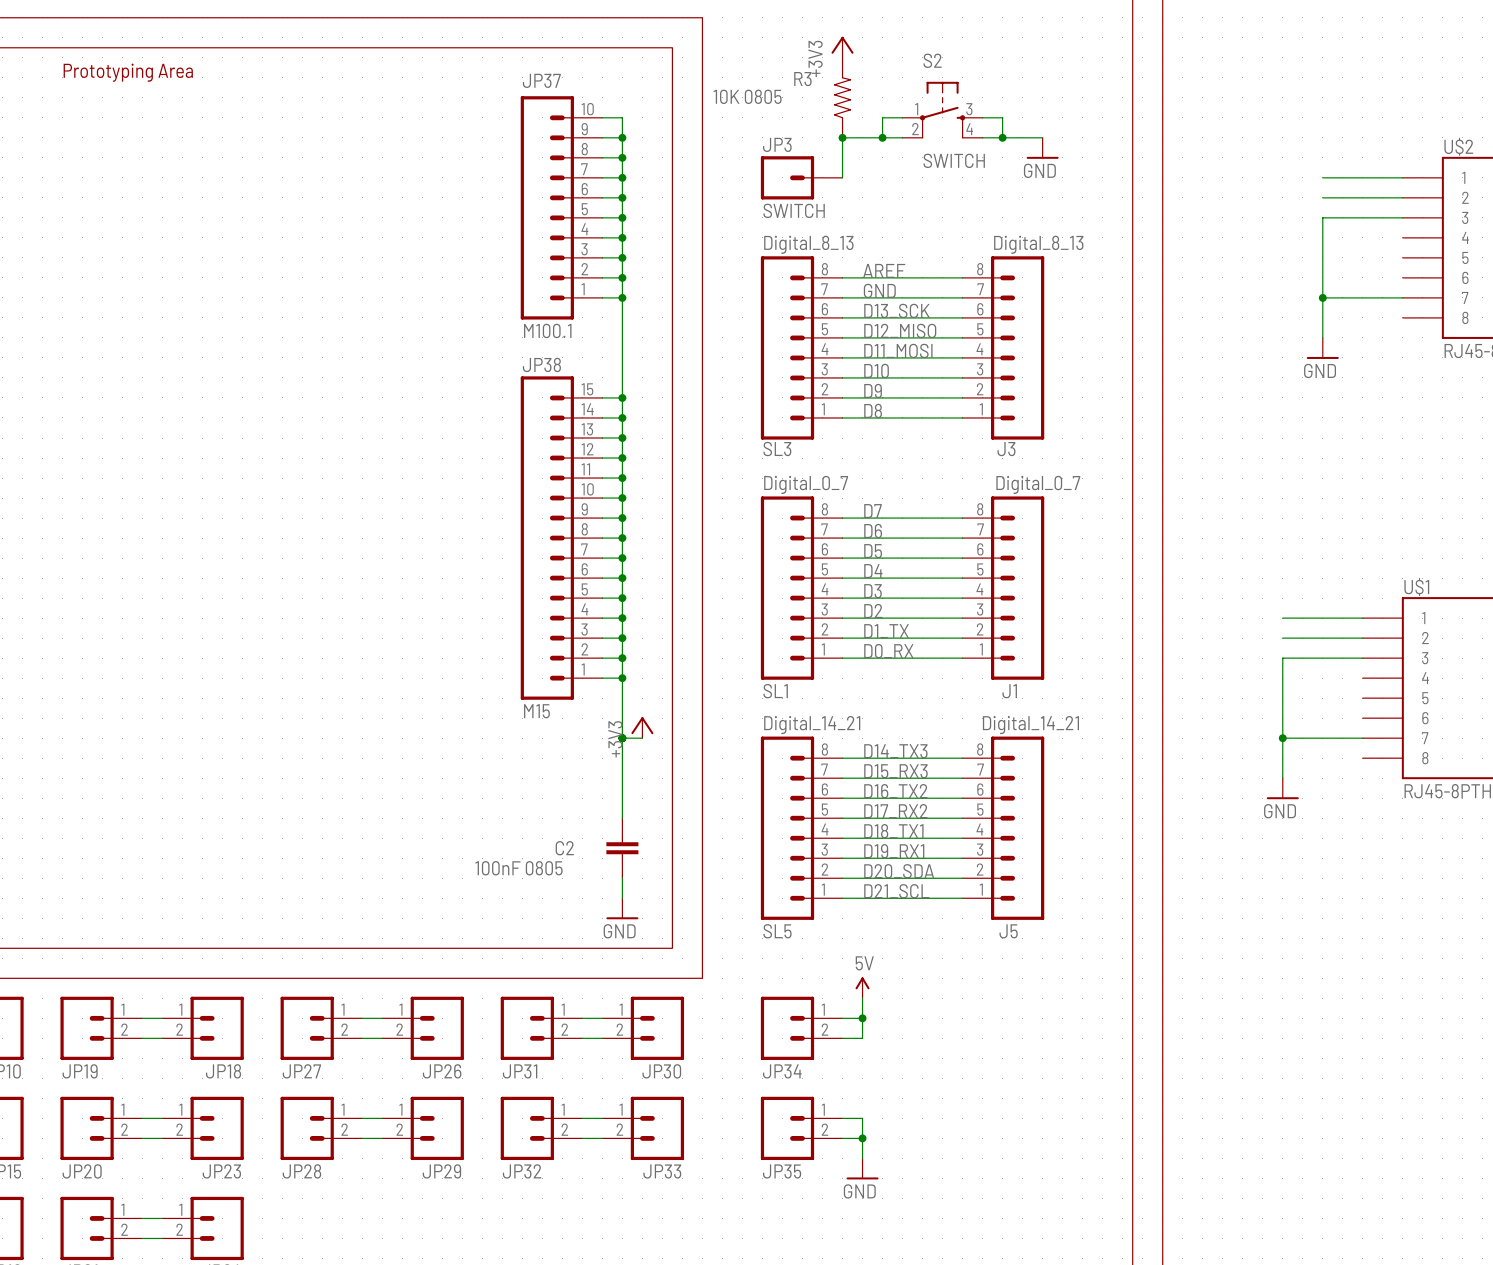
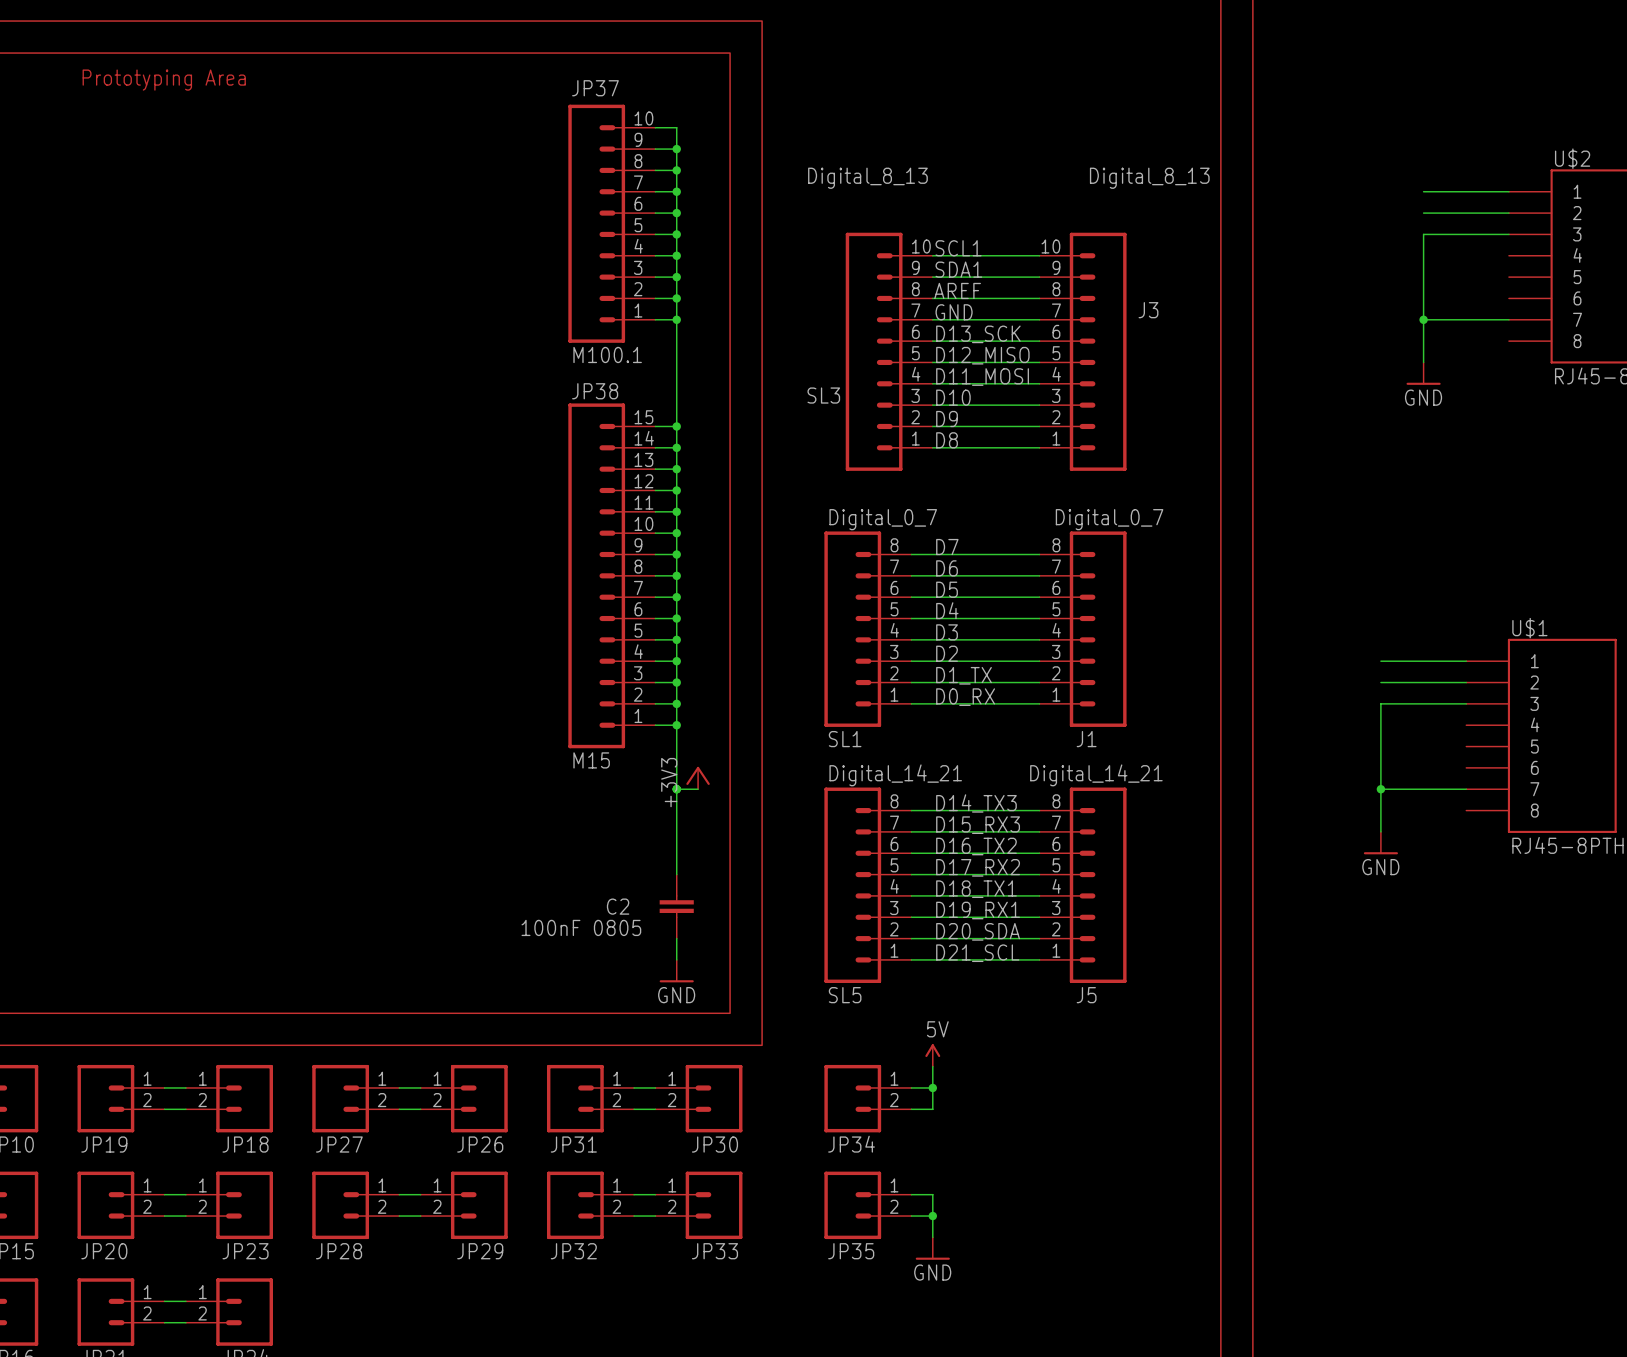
power symbol: +3V3 (842, 47) -> none
R3: 10K 0805 (842, 97) -> none
S2: SWITCH (942, 110) -> none
wire: (902, 117) (882, 117) (882, 137) -> none
wire: (982, 117) (1002, 117) (1002, 137) -> none
junction: (842, 137) -> none
junction: (882, 137) -> none
wire: (902, 137) (842, 137) (842, 177) -> none
wire: (982, 137) (1042, 137) -> none
junction: (1002, 137) -> none
power symbol: GND (1042, 148) -> none
JP3: SWITCH (801, 177) -> none
label: none -> SCL1 (958, 248)
wire: none -> (932, 255) (1039, 255)
SL3 value position: Digital_8_13 (808, 244) -> Digital_8_13 (867, 178)
J3 value position: Digital_8_13 (1038, 244) -> Digital_8_13 (1149, 178)
label: none -> SDA1 (958, 269)
SL3 symbol: [760, 256, 843, 440] -> [845, 232, 933, 471]
J3 symbol: [962, 256, 1045, 440] -> [1039, 232, 1127, 471]
wire: none -> (932, 277) (1039, 277)
SL3 name position: SL3 (777, 449) -> SL3 (823, 395)
J3 name position: J3 (1006, 449) -> J3 (1148, 310)

